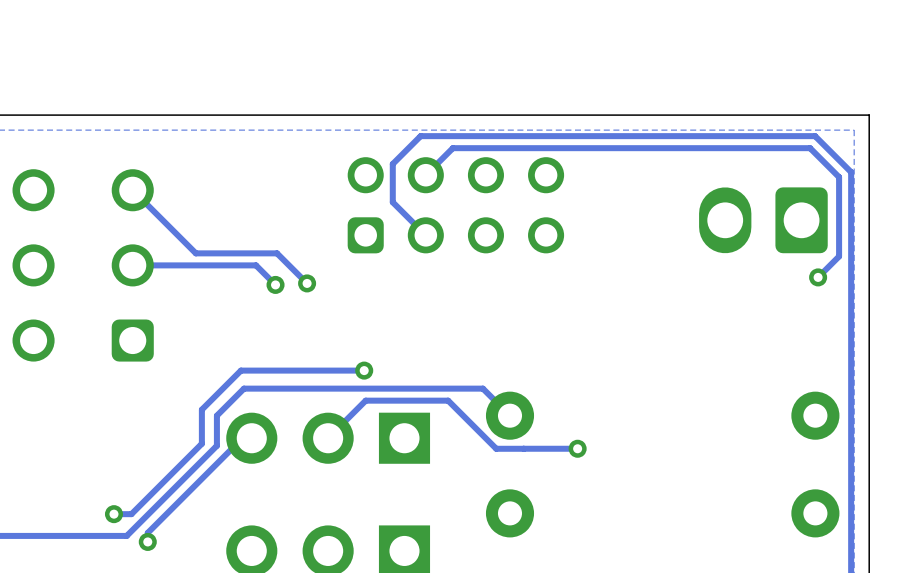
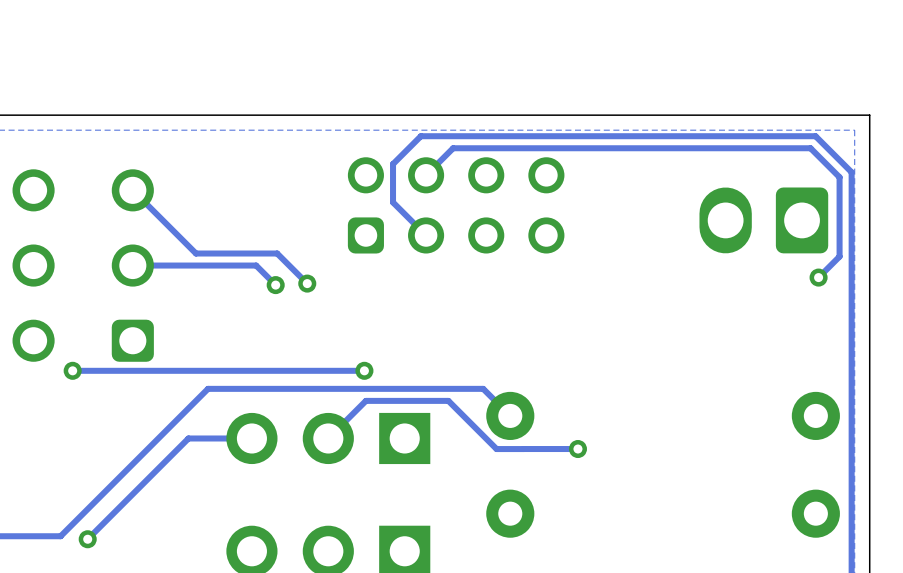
via: none -> (72, 370)
track: (240, 370) (201, 409) (201, 443) (131, 514) (113, 514) -> (241, 370) (72, 370)
track: (243, 388) (216, 415) (216, 445) (126, 535) (60, 535) -> (244, 388) (208, 388) (60, 536)
track: (242, 438) (147, 532) (147, 541) -> (242, 438) (188, 438) (87, 539)
via: (113, 514) -> none
via: none -> (87, 539)
via: (147, 541) -> none

